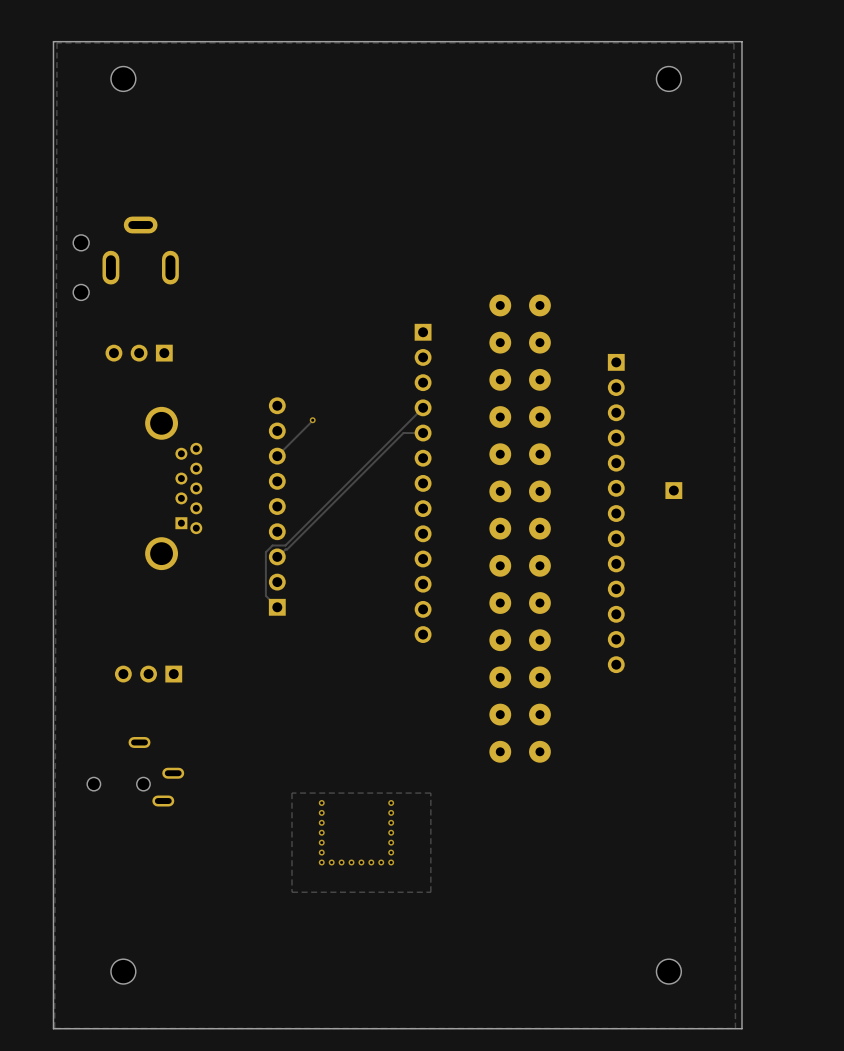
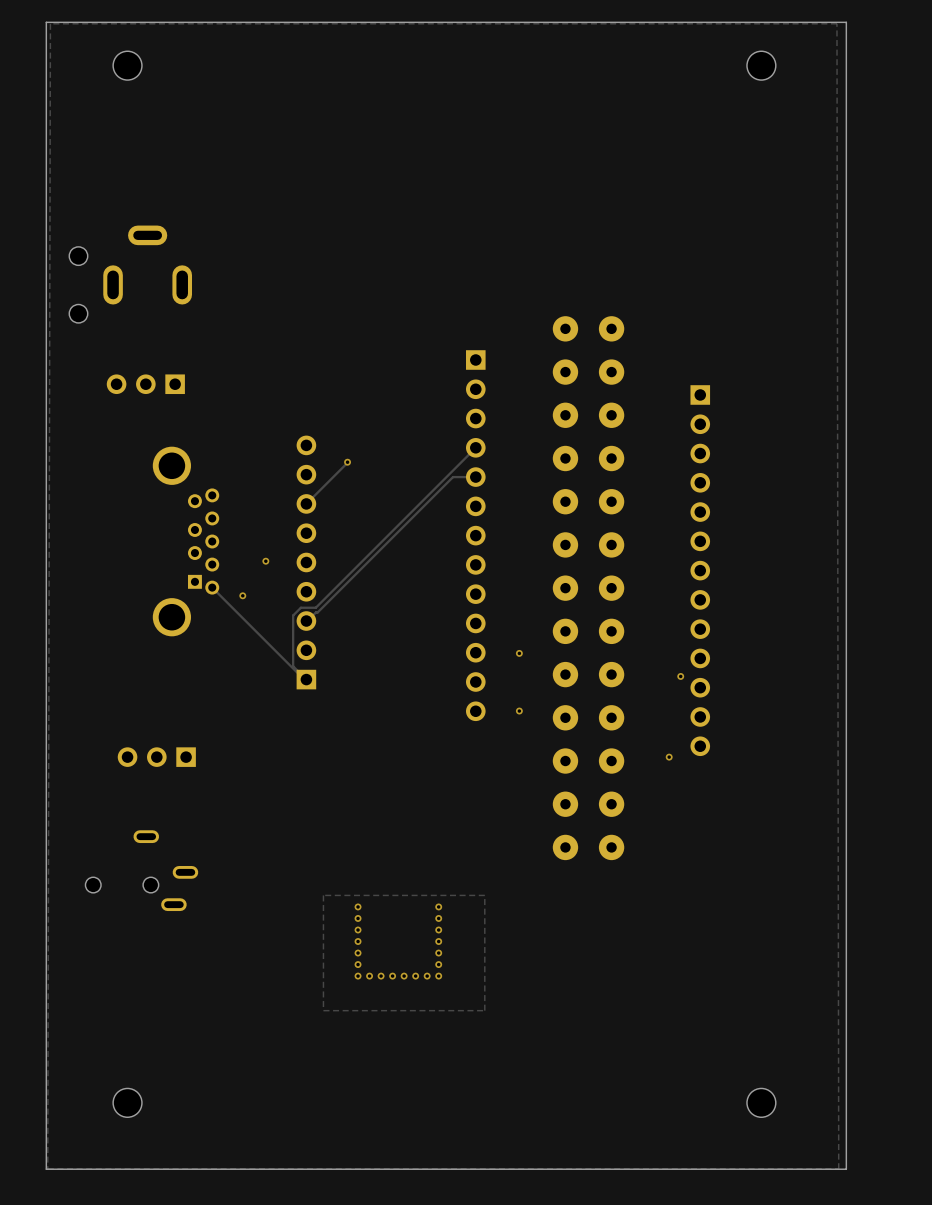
part: (673, 490) -> none
via: none -> (265, 561)
track: none -> (212, 587) (304, 679)
via: none -> (242, 595)
via: none -> (519, 653)
via: none -> (680, 676)
via: none -> (519, 711)
via: none -> (669, 757)

